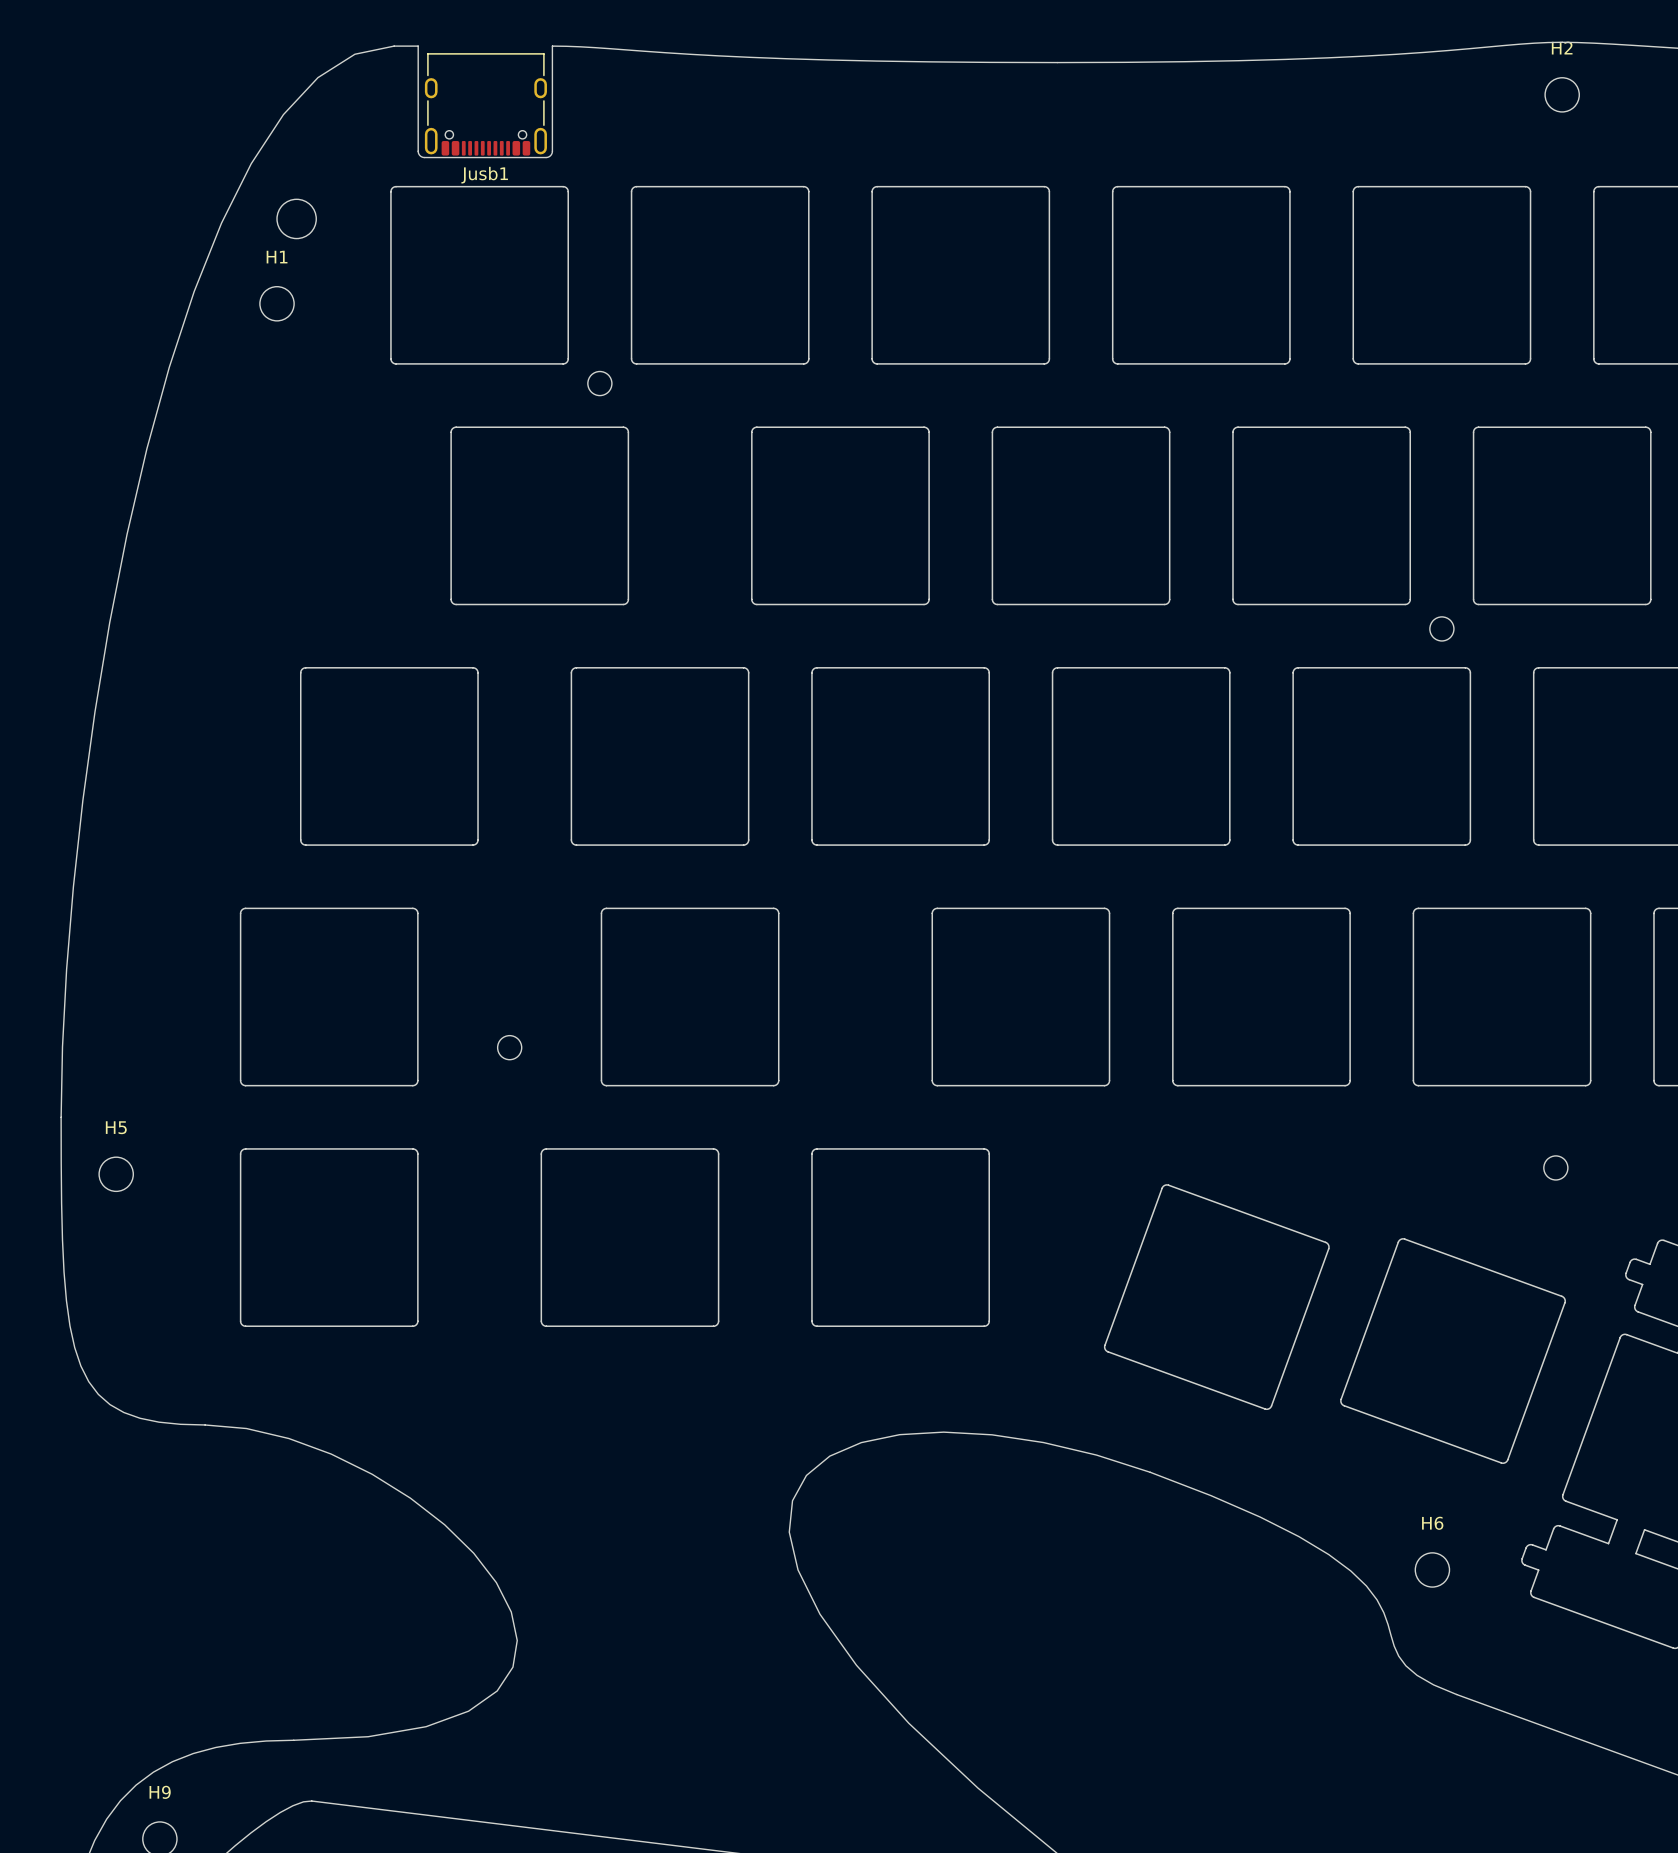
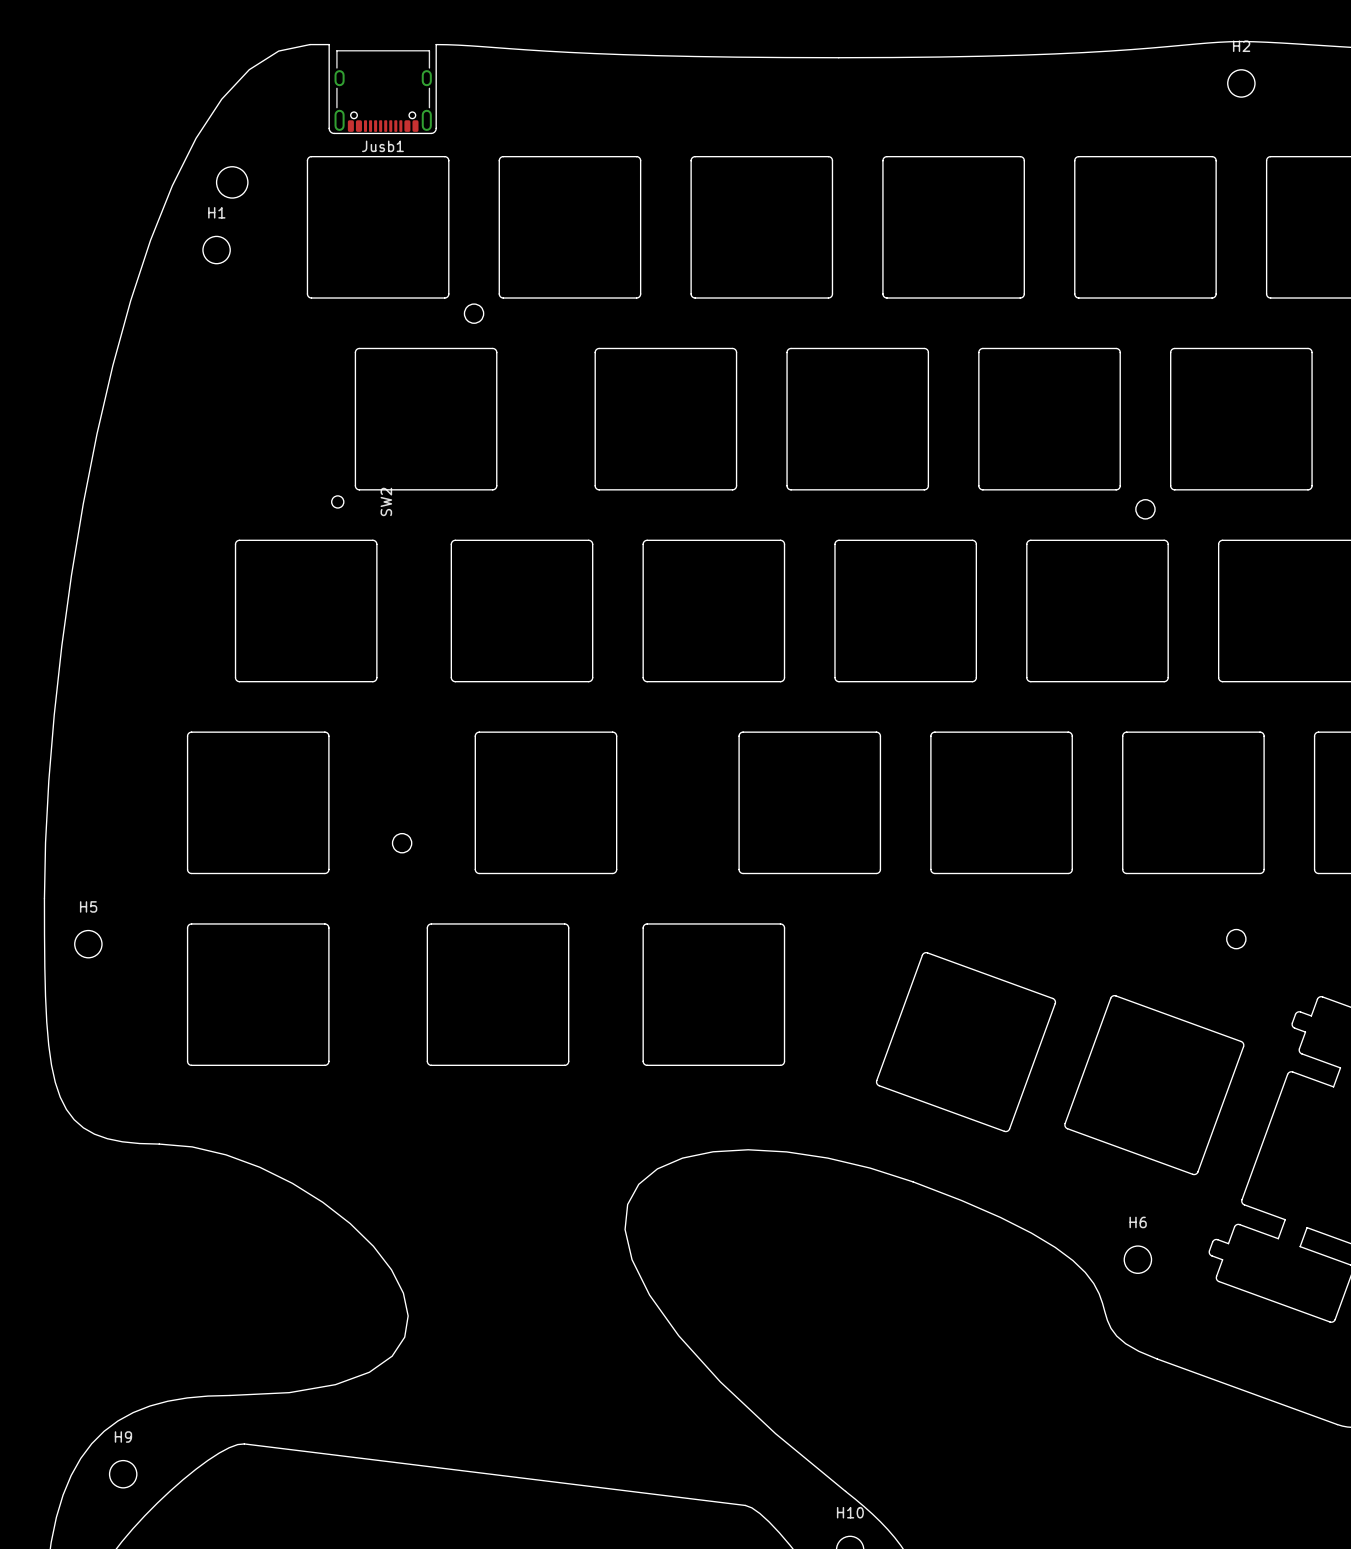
SW2: none -> (337, 501)

